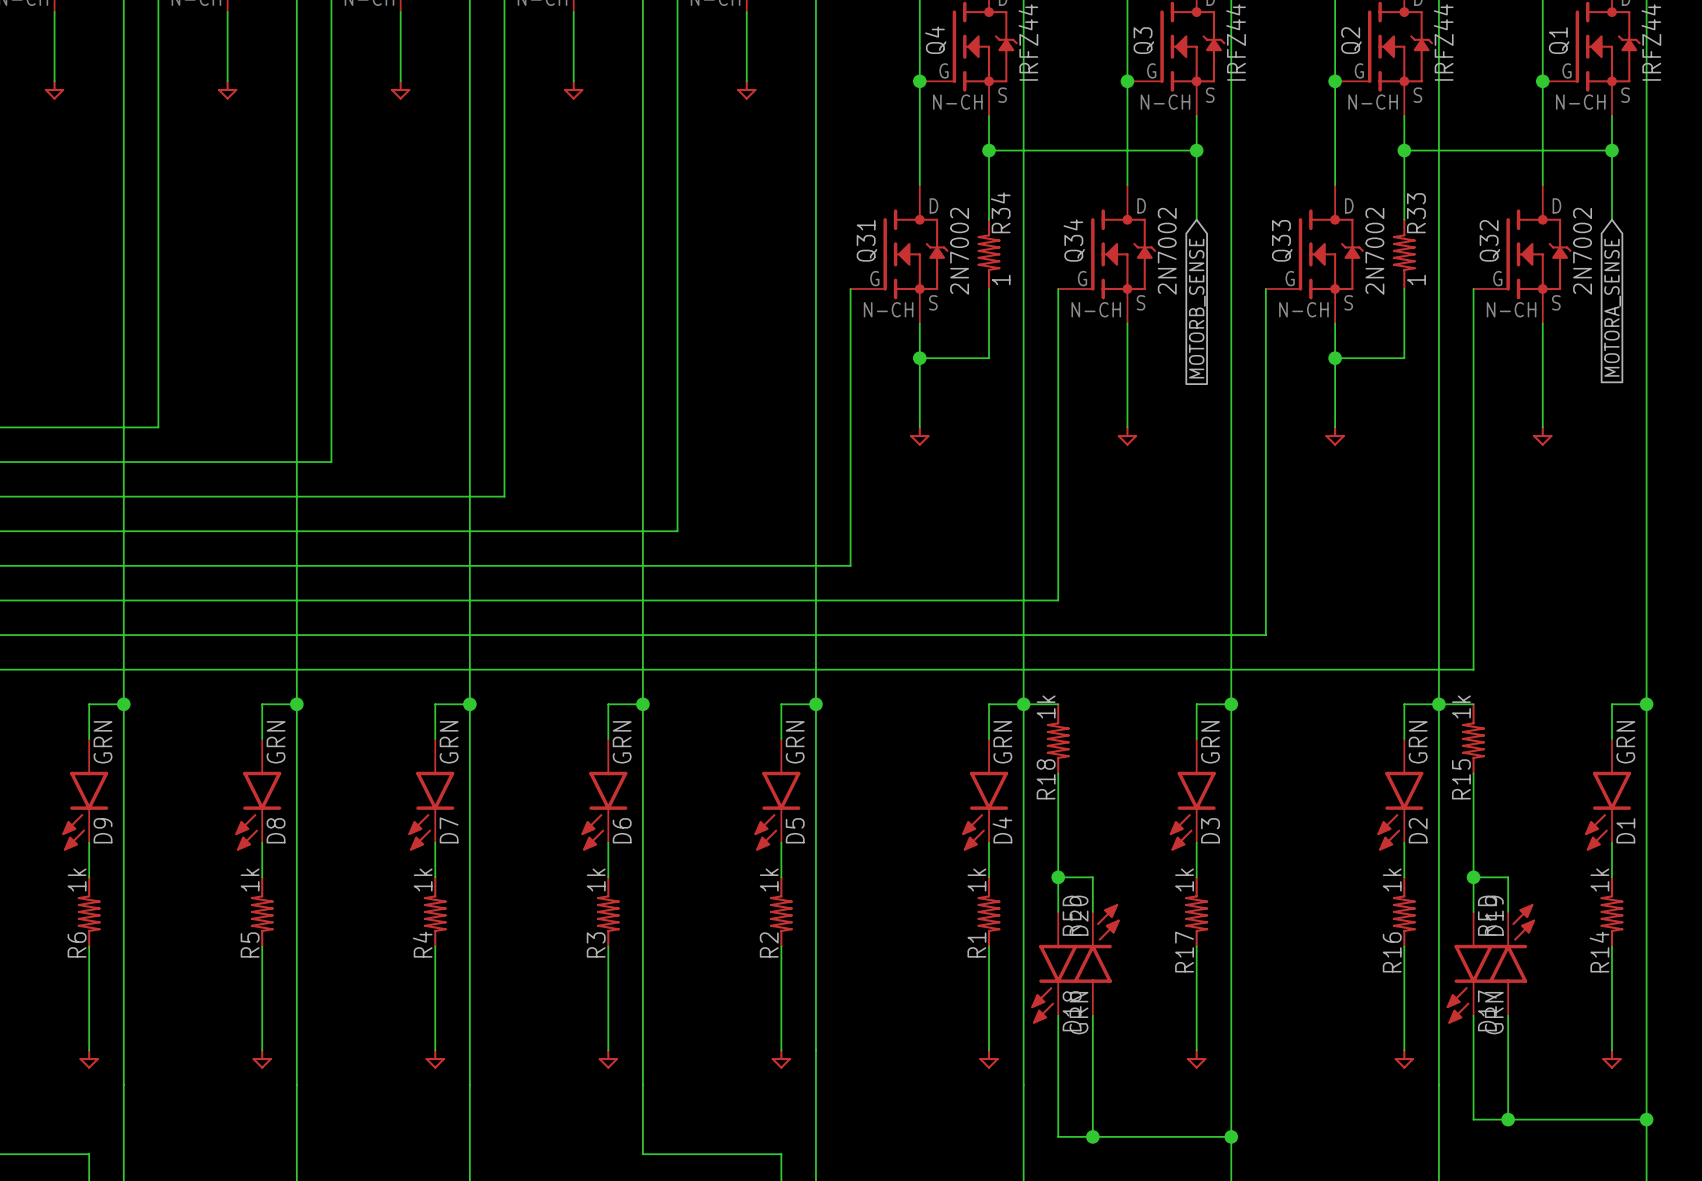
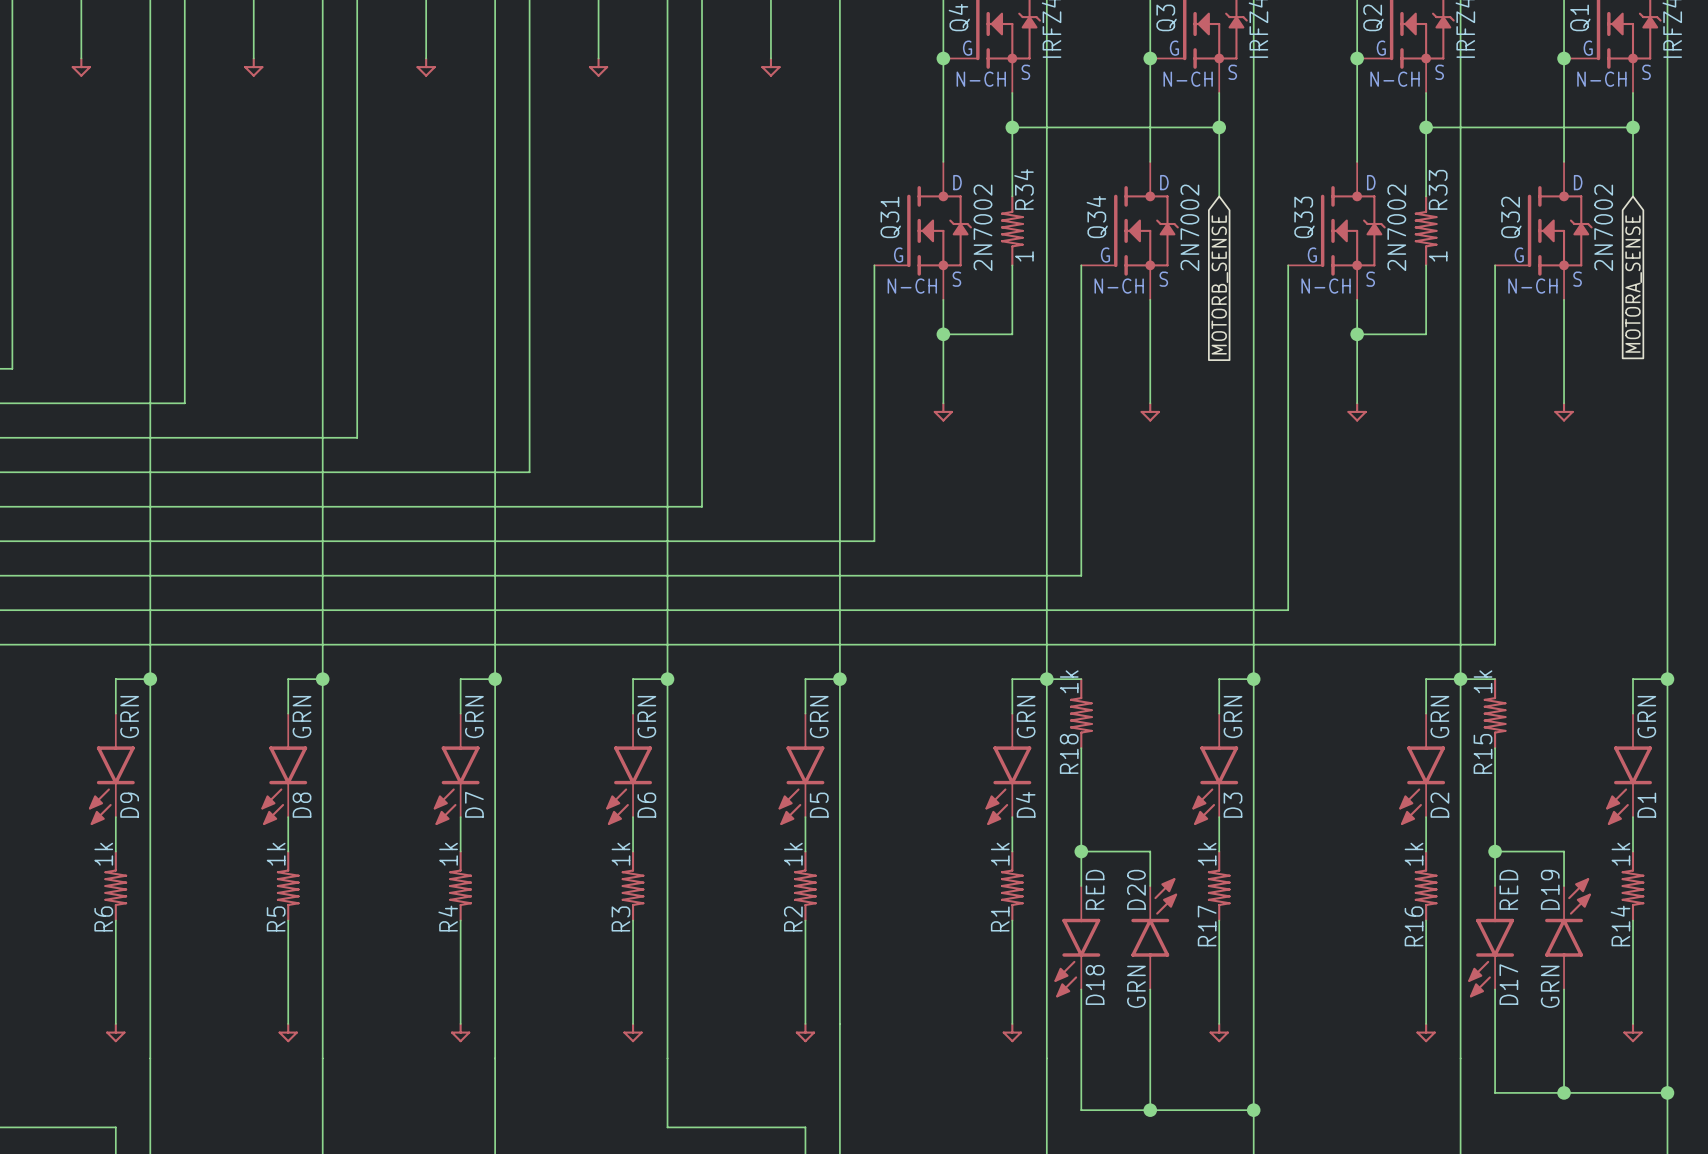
wire: (1092, 877) (1092, 911) -> (1115, 851) (1150, 851) (1150, 886)
wire: (1508, 877) (1508, 911) -> (1529, 851) (1564, 851) (1564, 886)
D20 position: (1096, 959) -> (1154, 933)
D19 position: (1512, 959) -> (1568, 933)
wire: (1092, 1015) (1092, 1136) -> (1150, 989) (1150, 1110)
wire: (1508, 1015) (1508, 1119) -> (1564, 989) (1564, 1092)
junction position: (1508, 1119) -> (1564, 1092)
junction position: (1092, 1136) -> (1150, 1110)

